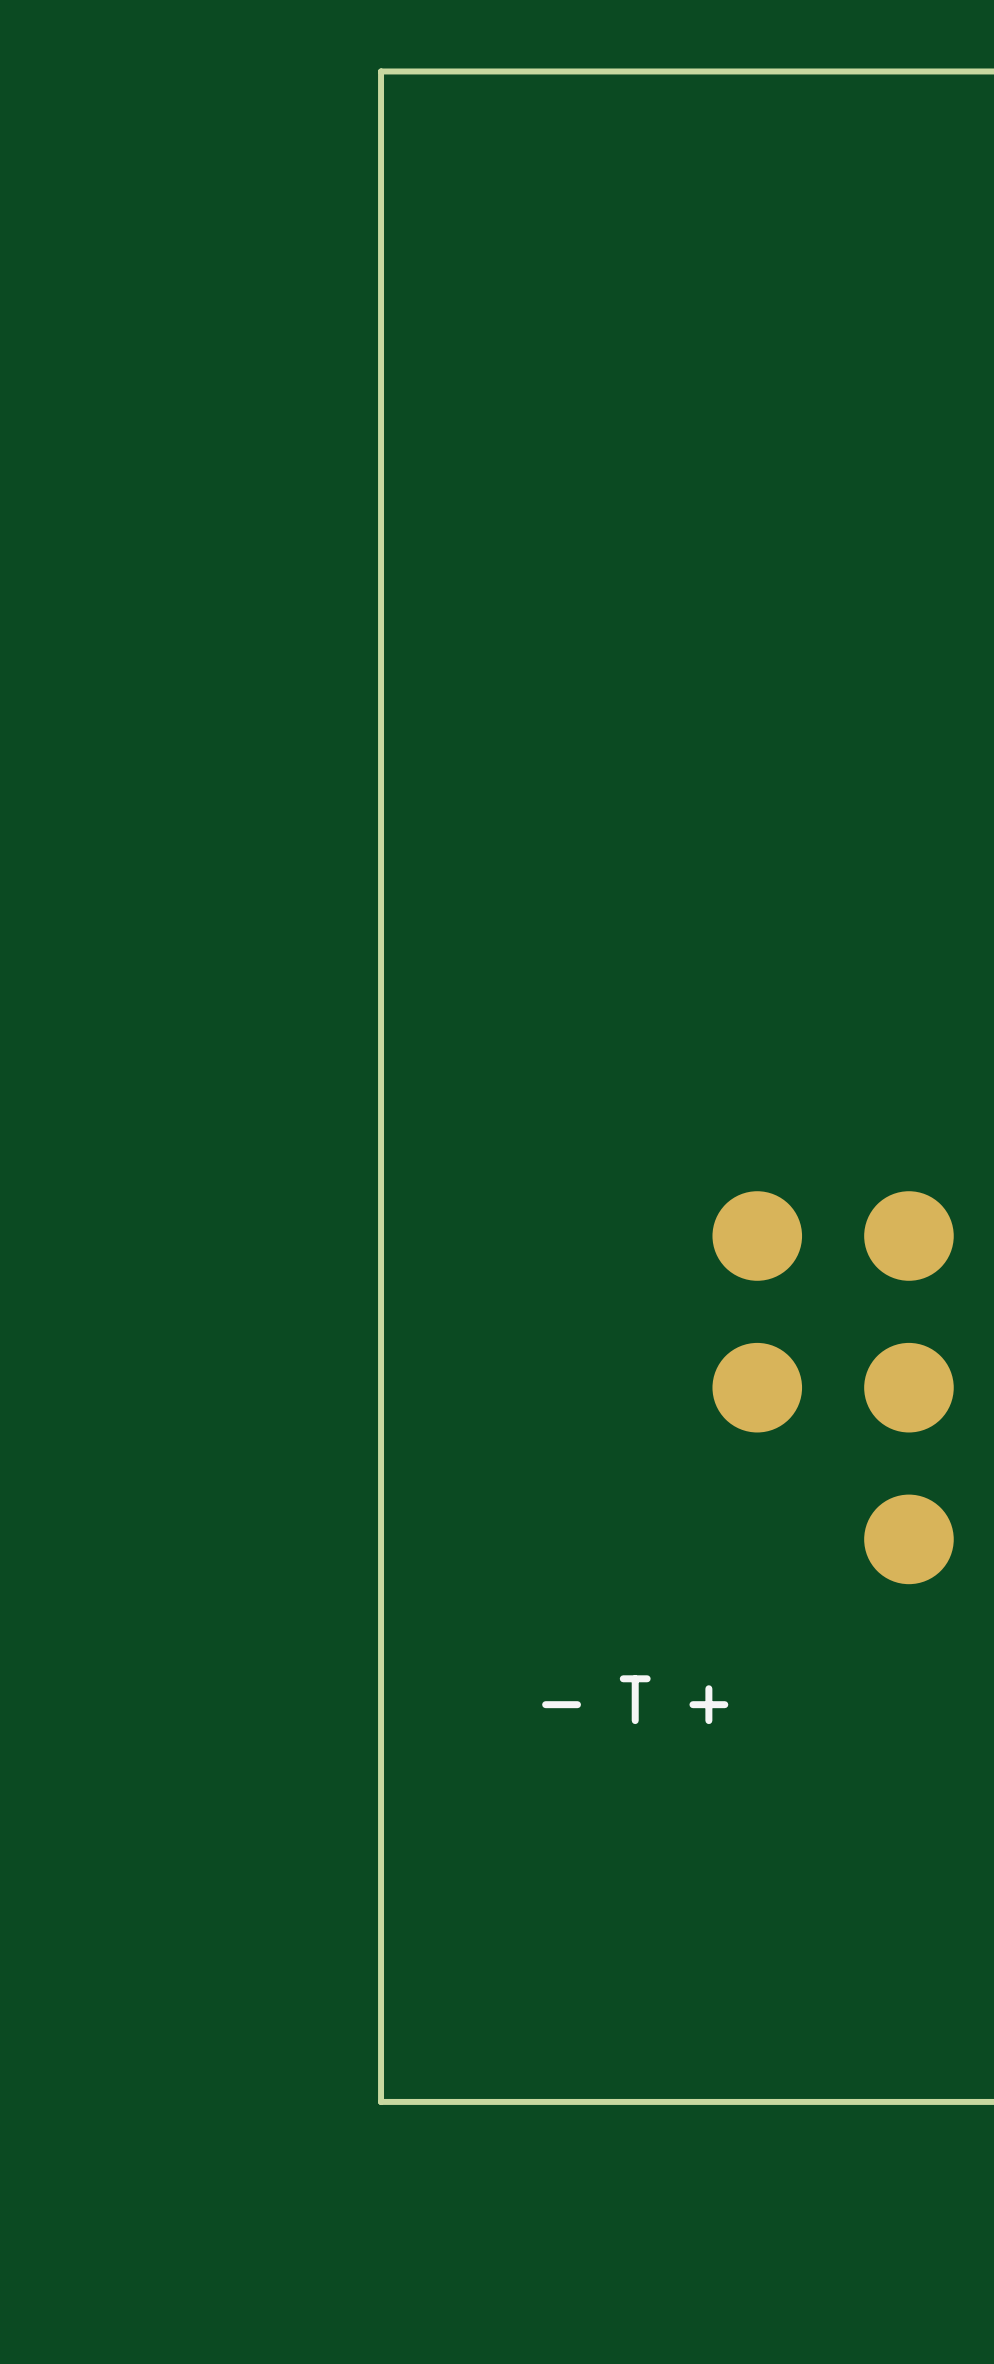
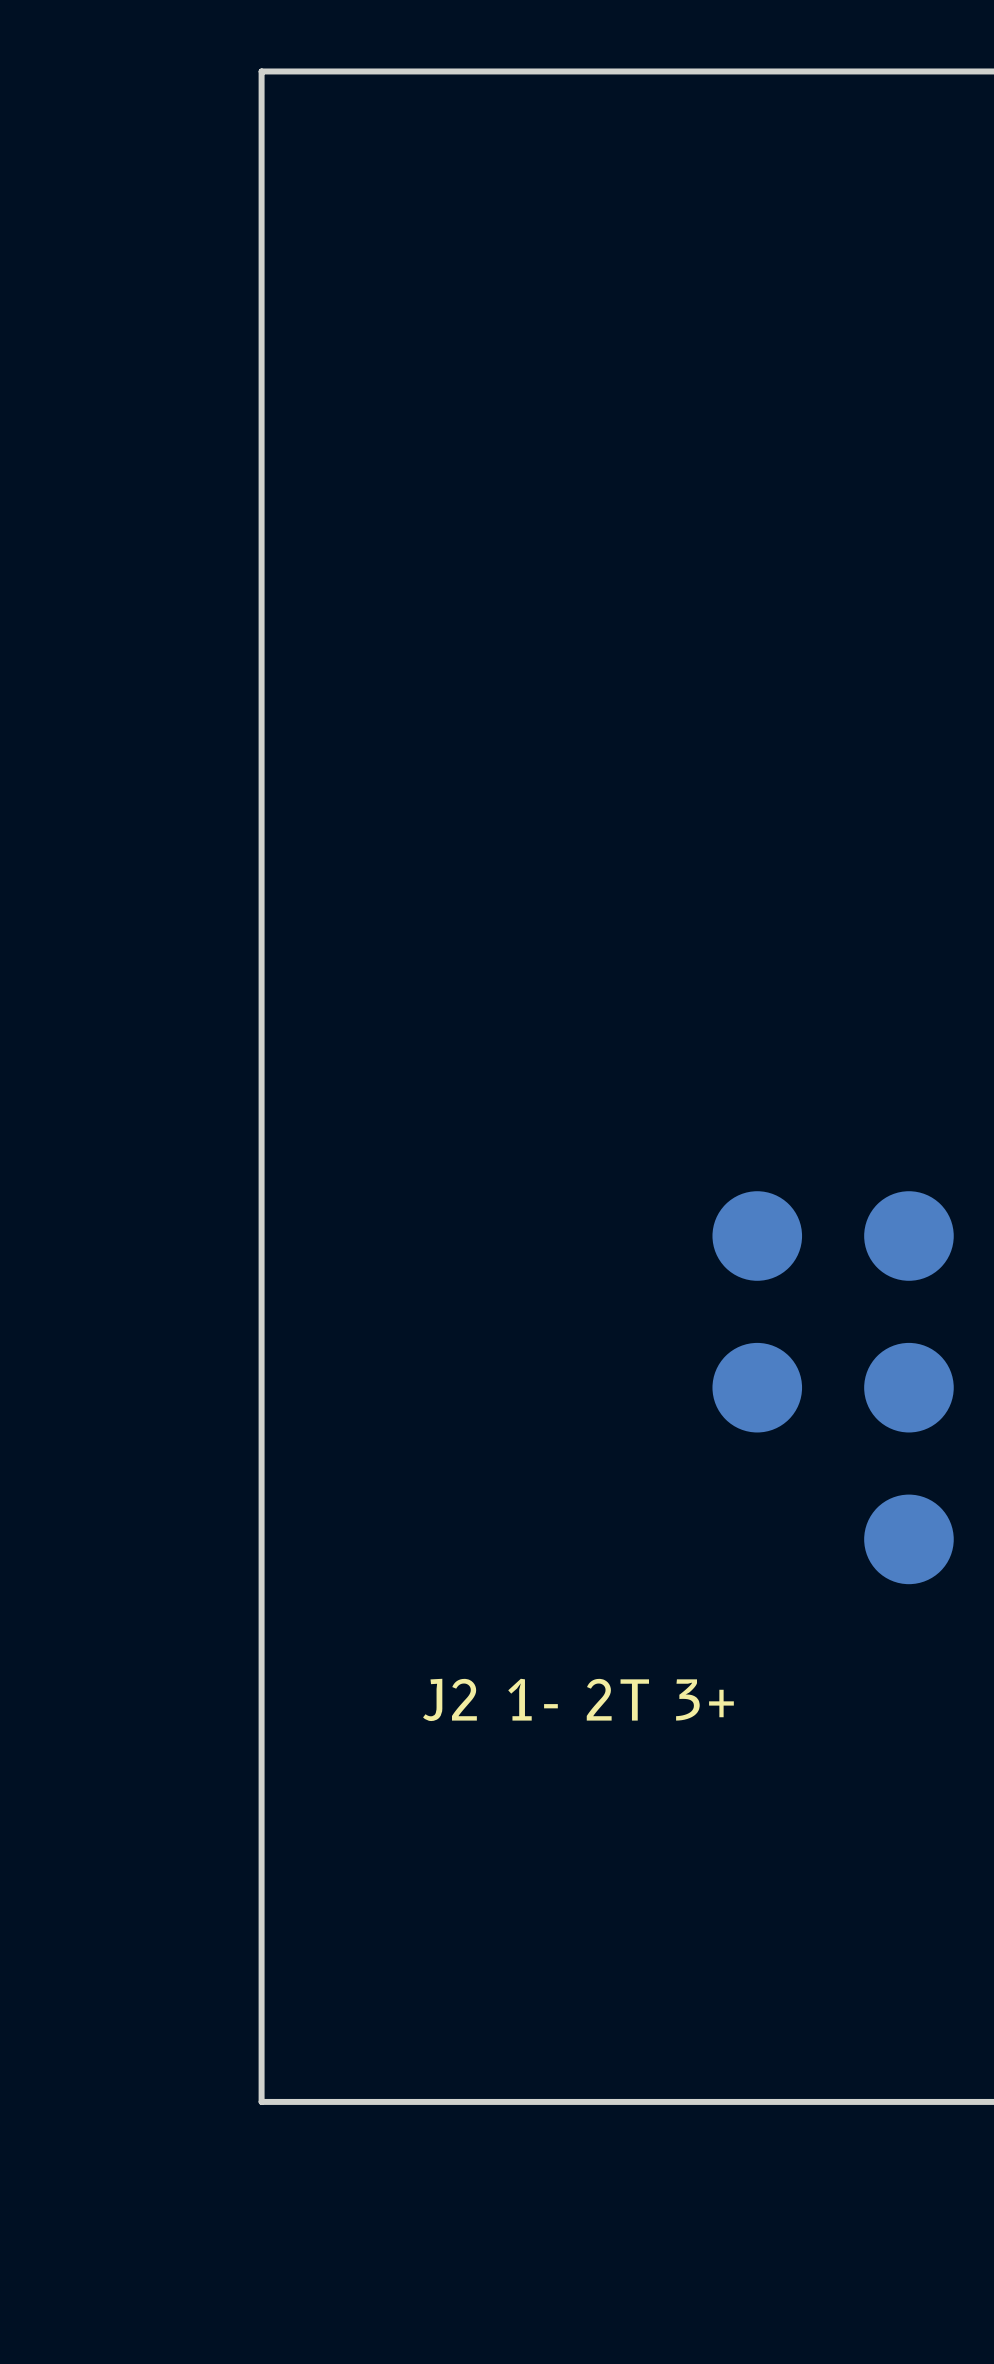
board edge: (381, 71) (381, 2101) -> (381, 71) (261, 71) (261, 2101) (381, 2101)
text: - T + (635, 1699) -> J2 1- 2T 3+ (578, 1699)

